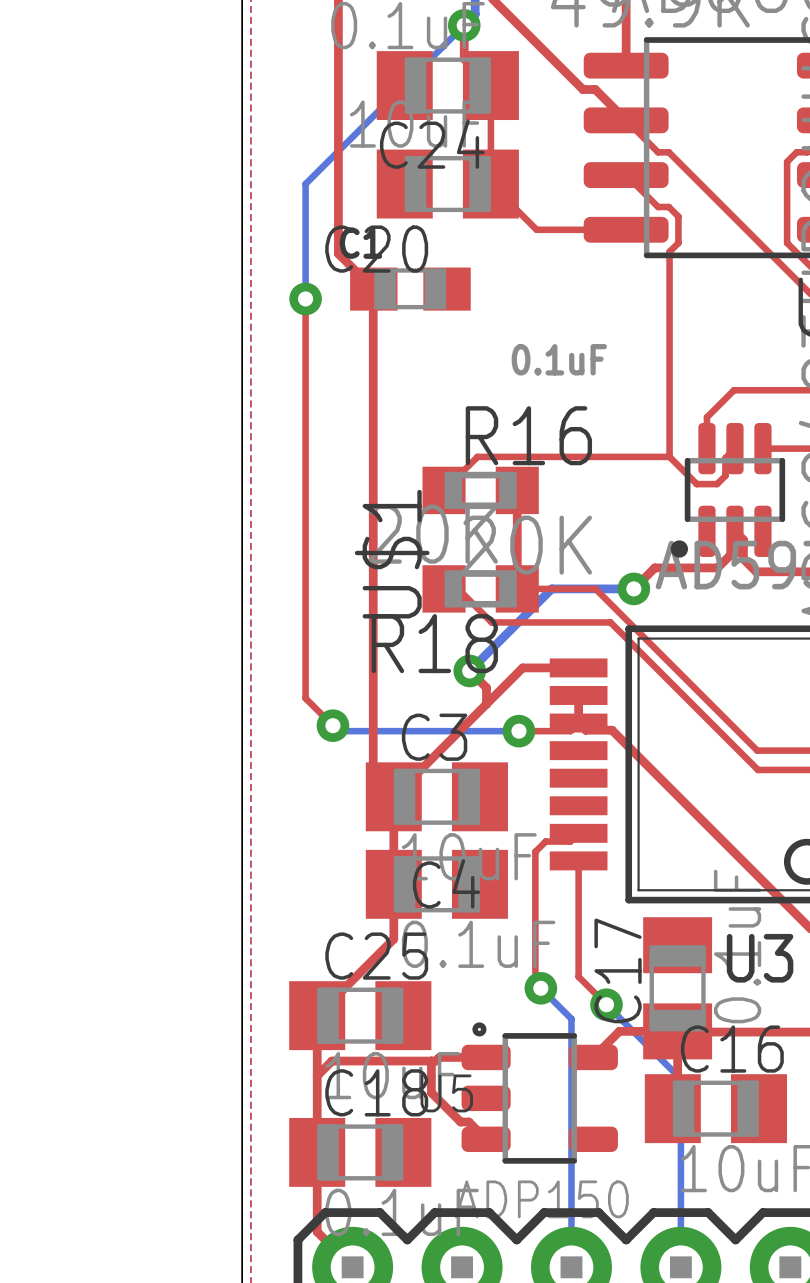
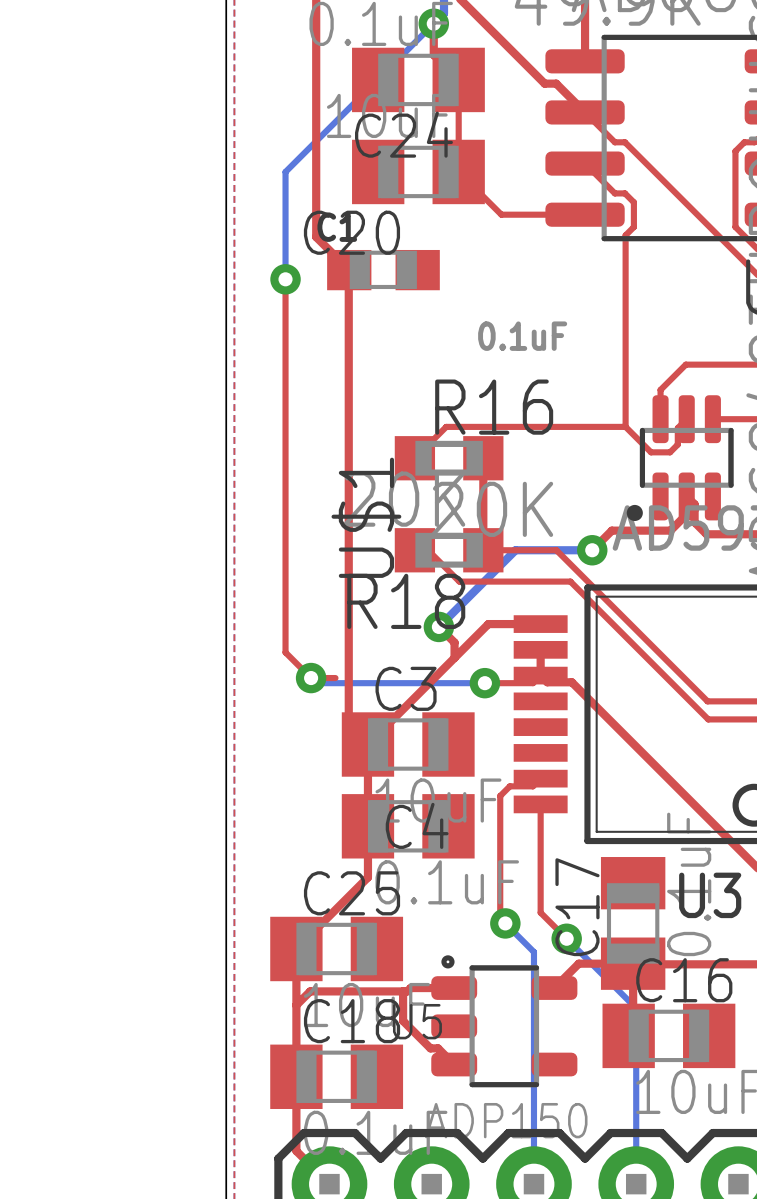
top track: none -> (311, 678) (335, 678)

